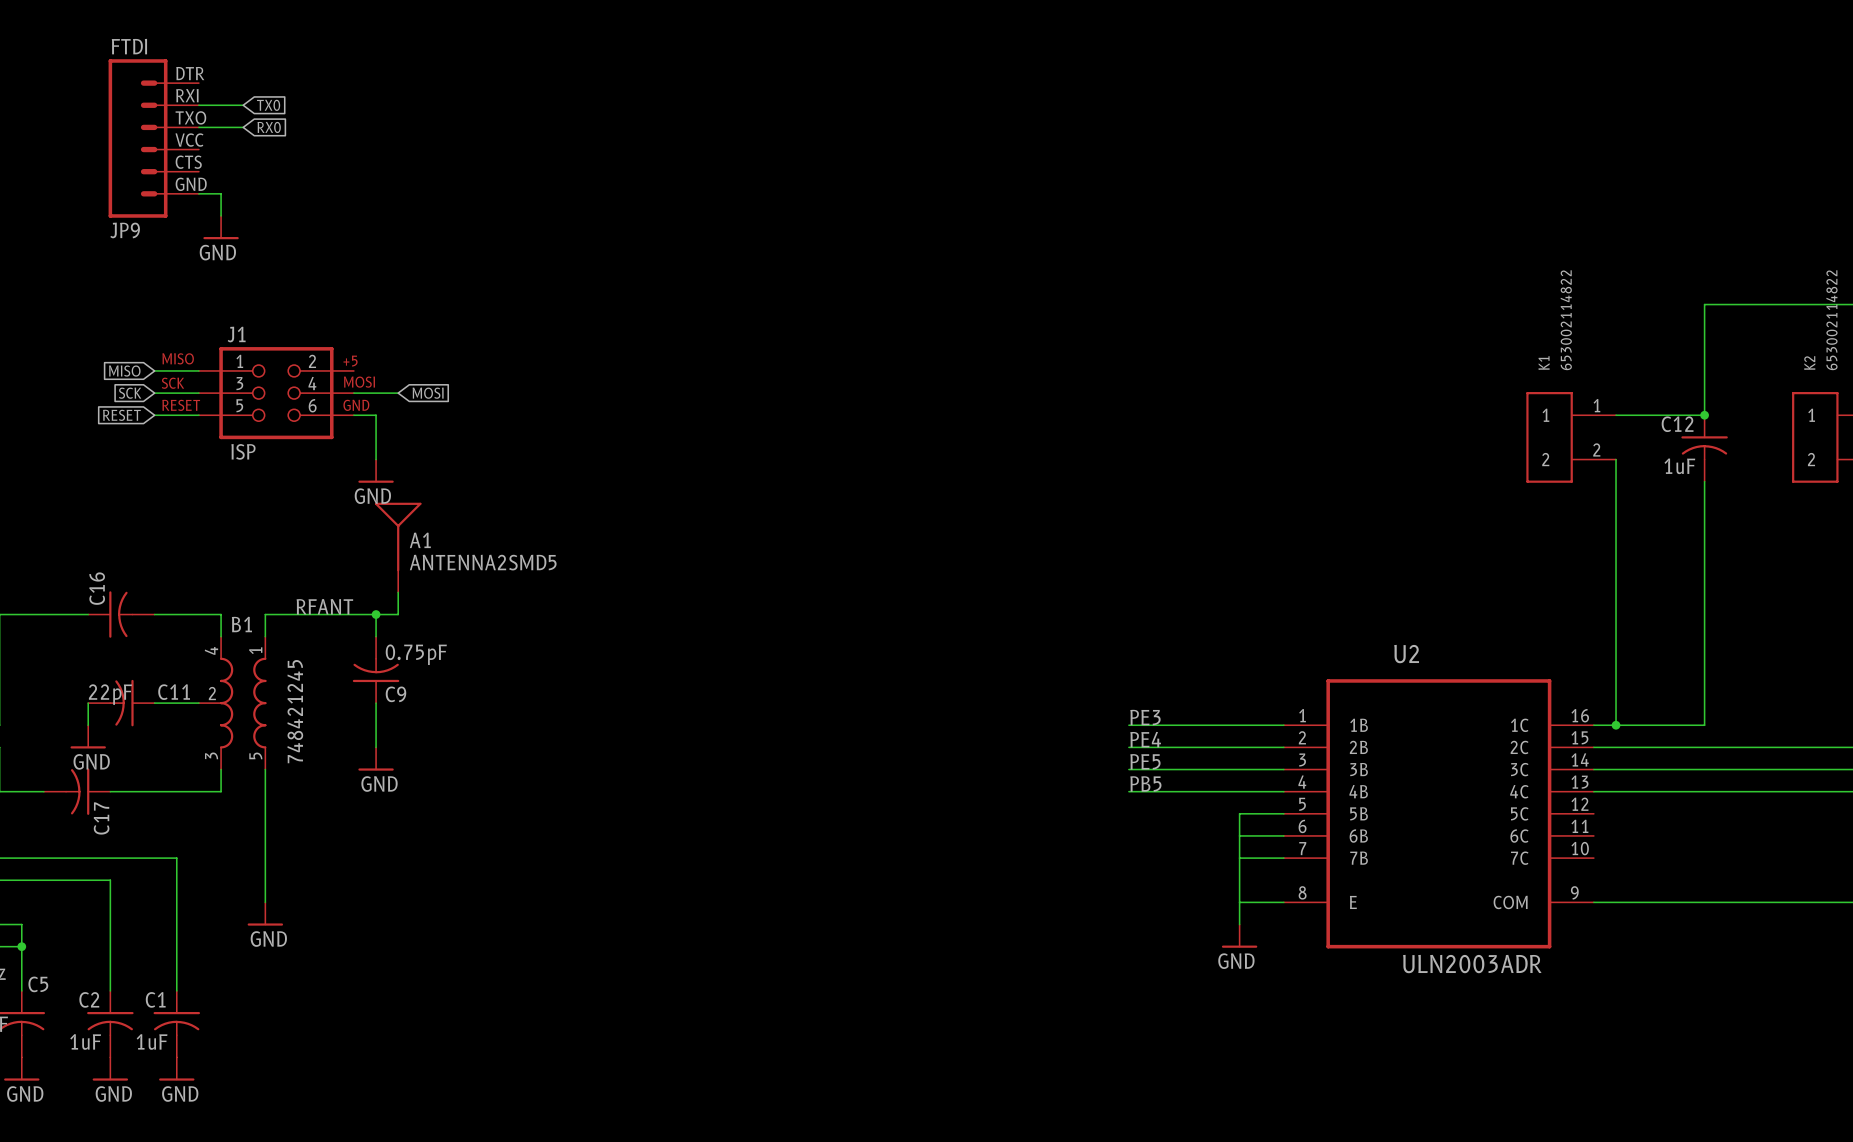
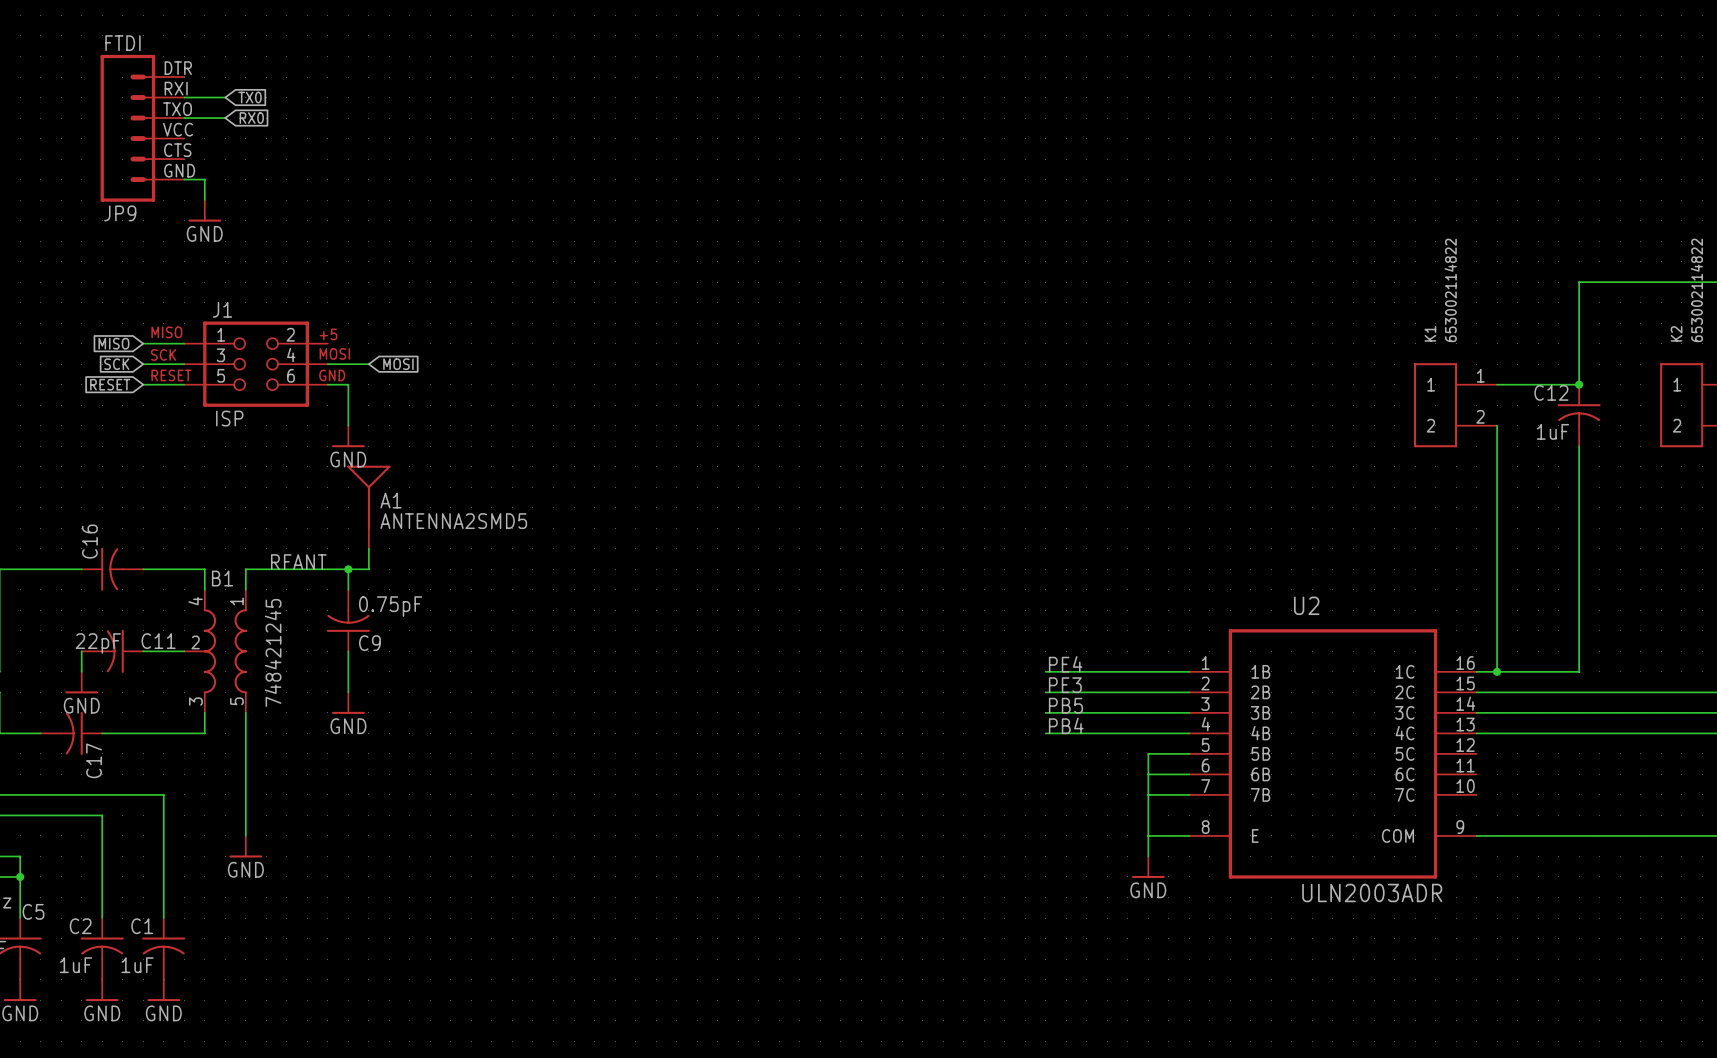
label: PE3 (1145, 717) -> PE4 (1065, 664)
label: PE4 (1145, 739) -> PE3 (1065, 685)
label: PE5 (1145, 761) -> PB5 (1065, 705)
label: PB5 (1145, 783) -> PB4 (1066, 725)

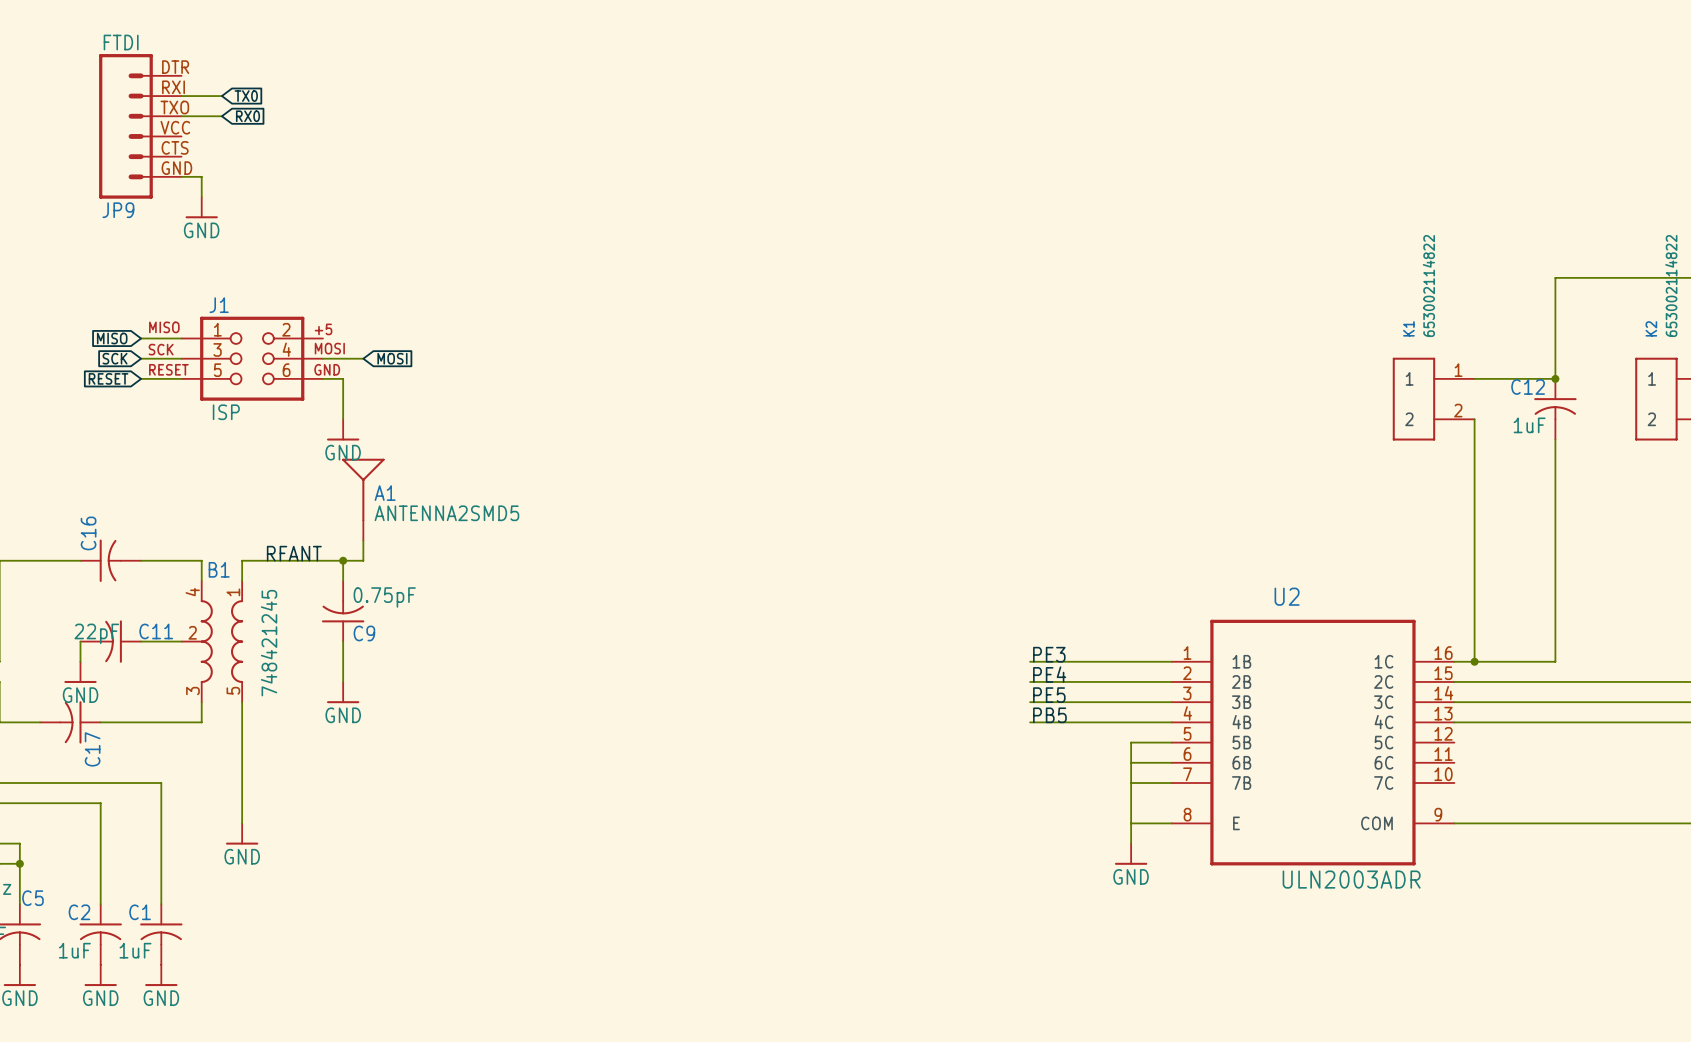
label: PE4 (1065, 664) -> PE3 (1049, 654)
label: PE3 (1065, 685) -> PE4 (1049, 674)
label: PB5 (1065, 705) -> PE5 (1049, 695)
label: PB4 (1066, 725) -> PB5 (1049, 715)

